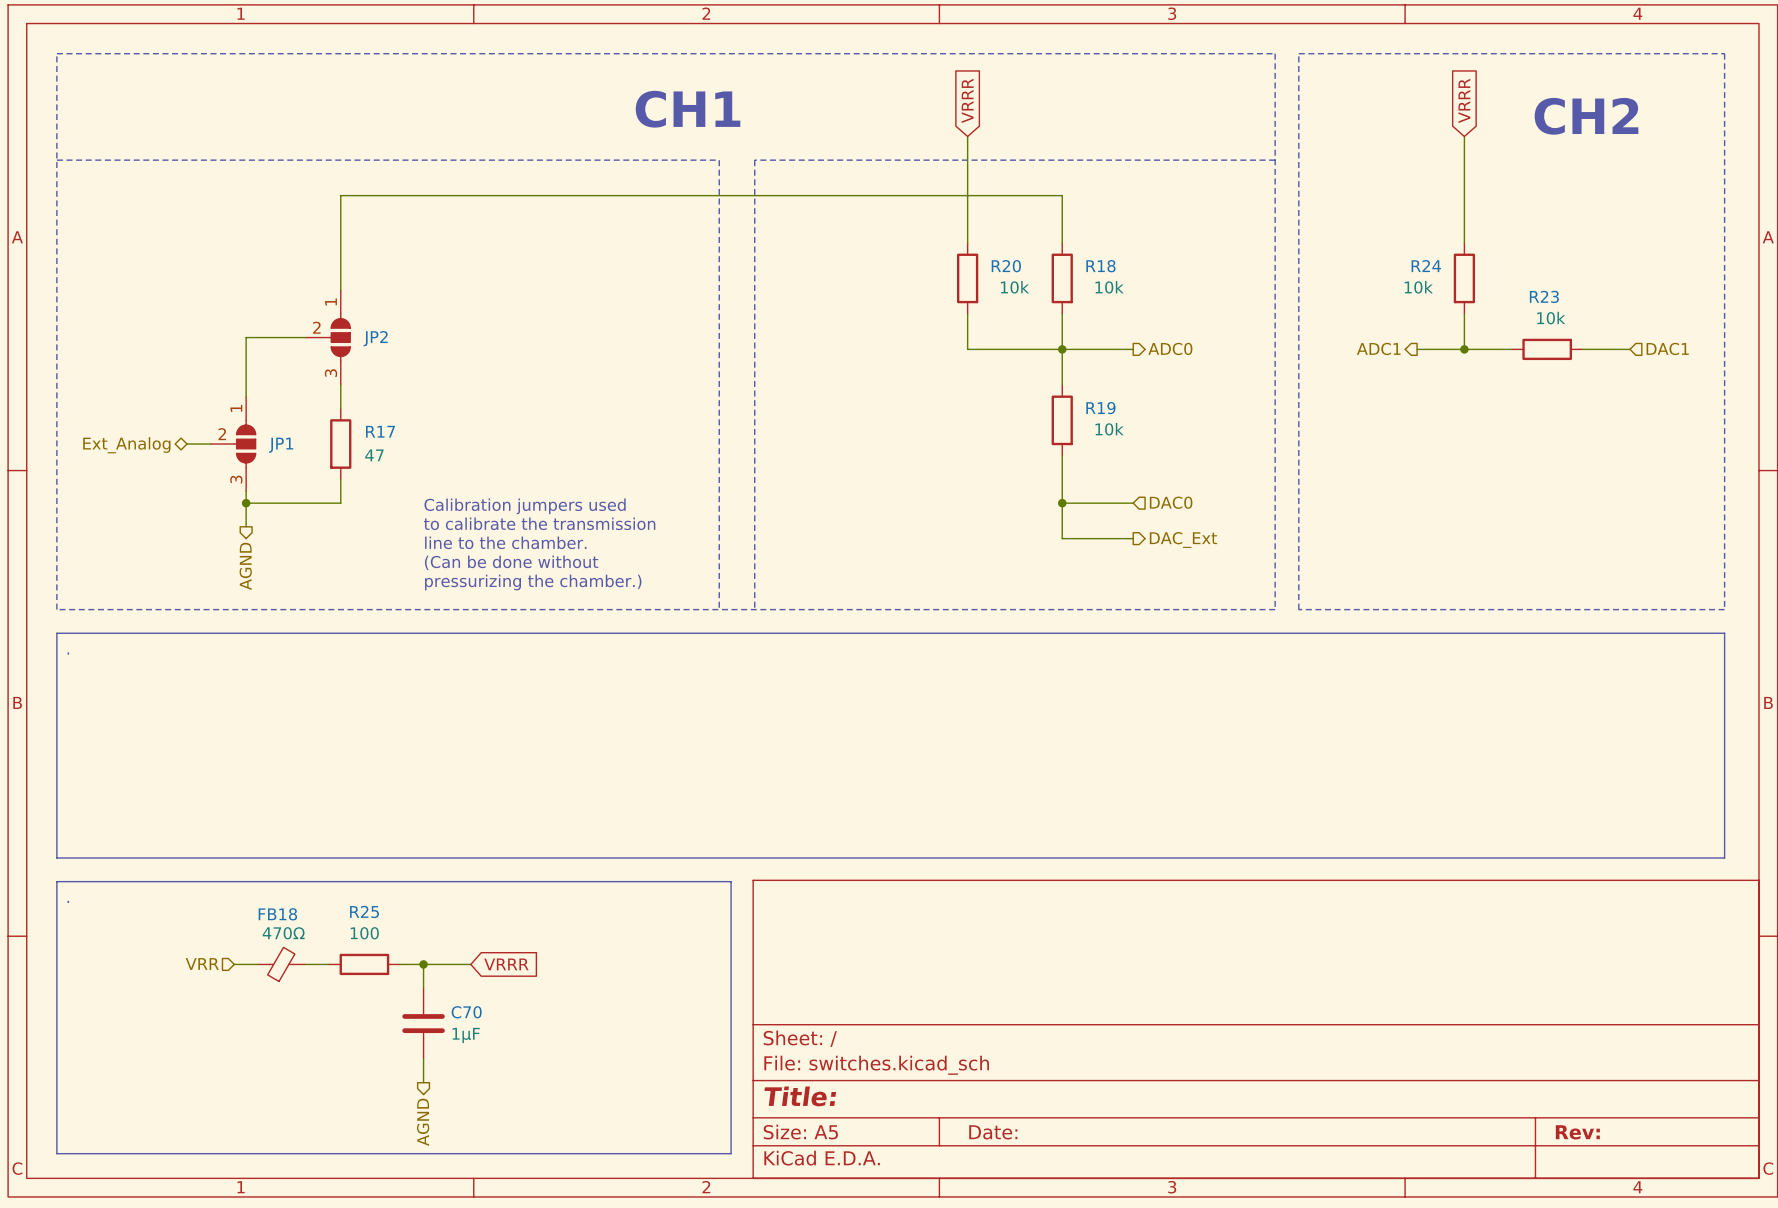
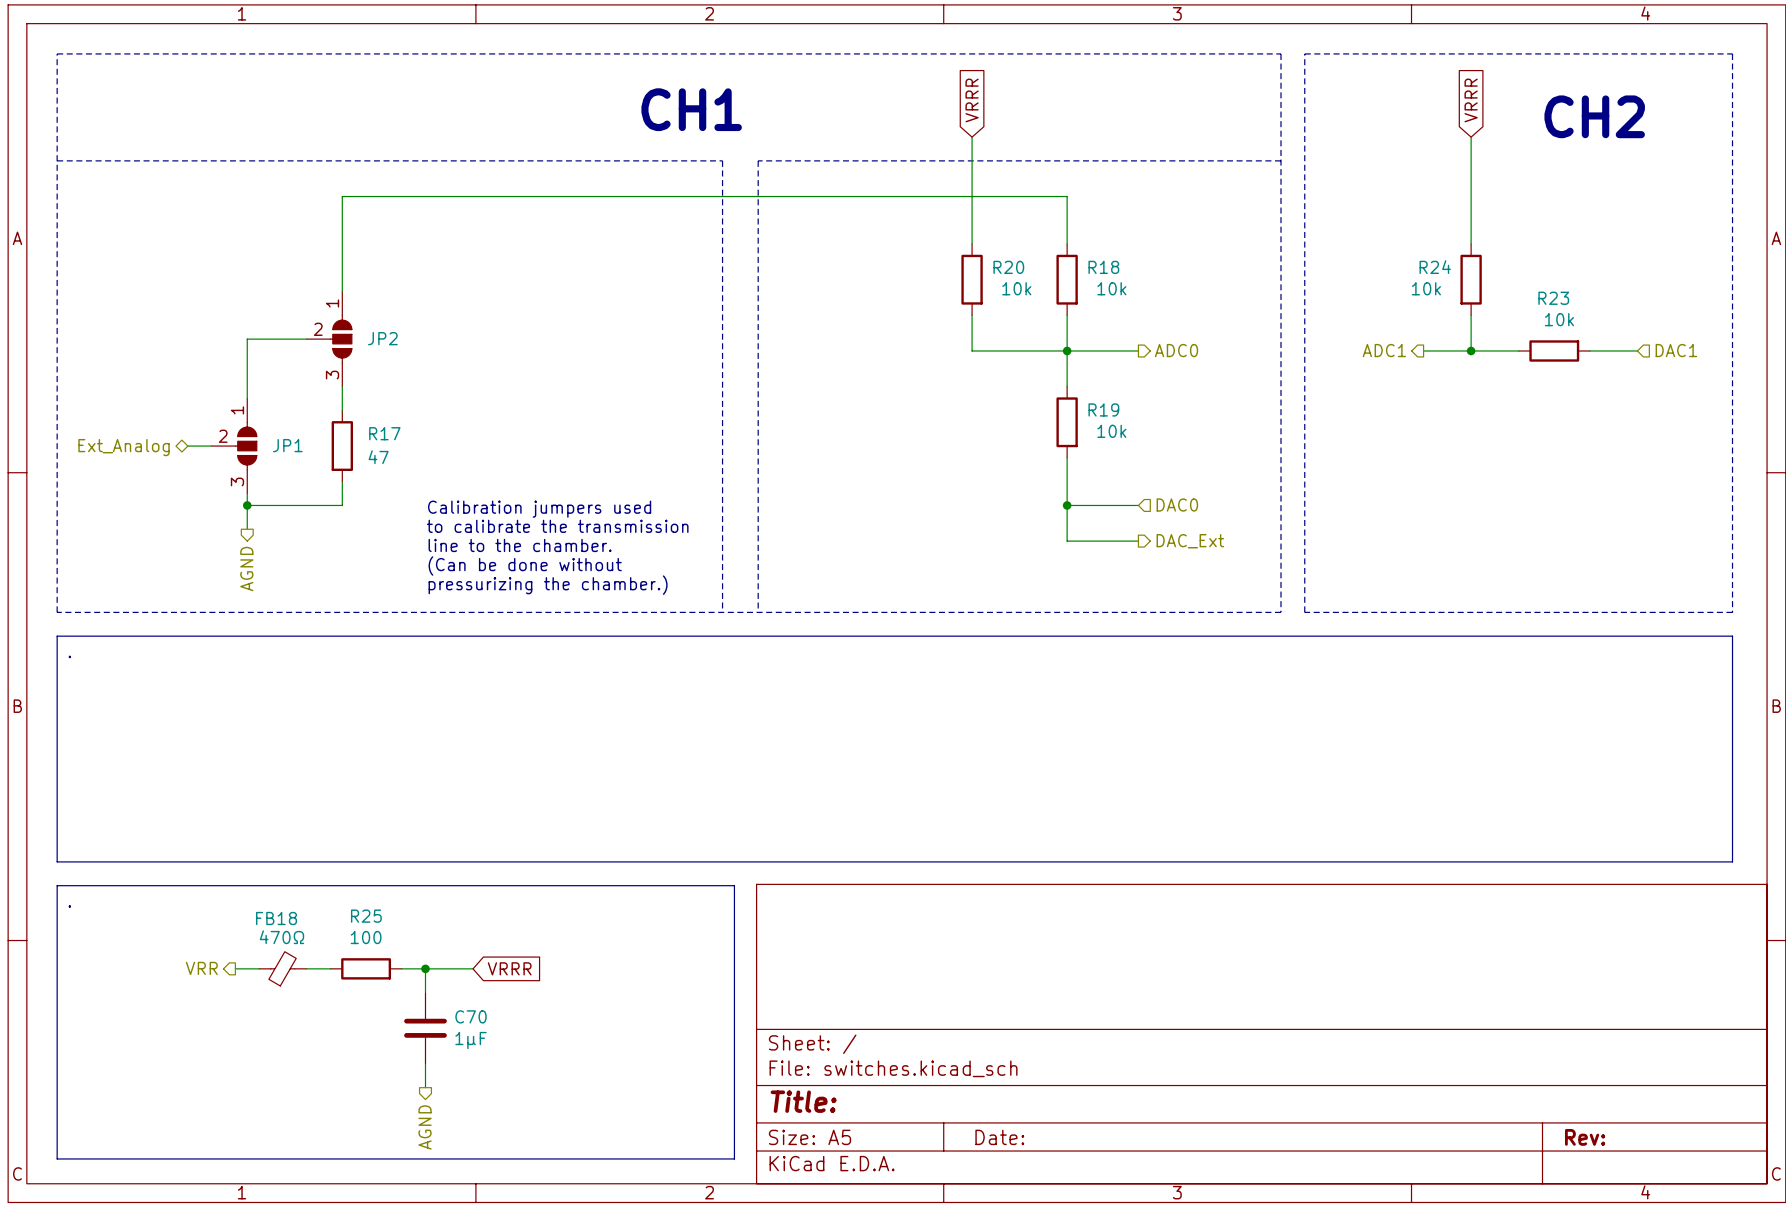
hierarchical label shape: input (202, 963) -> output (201, 968)

